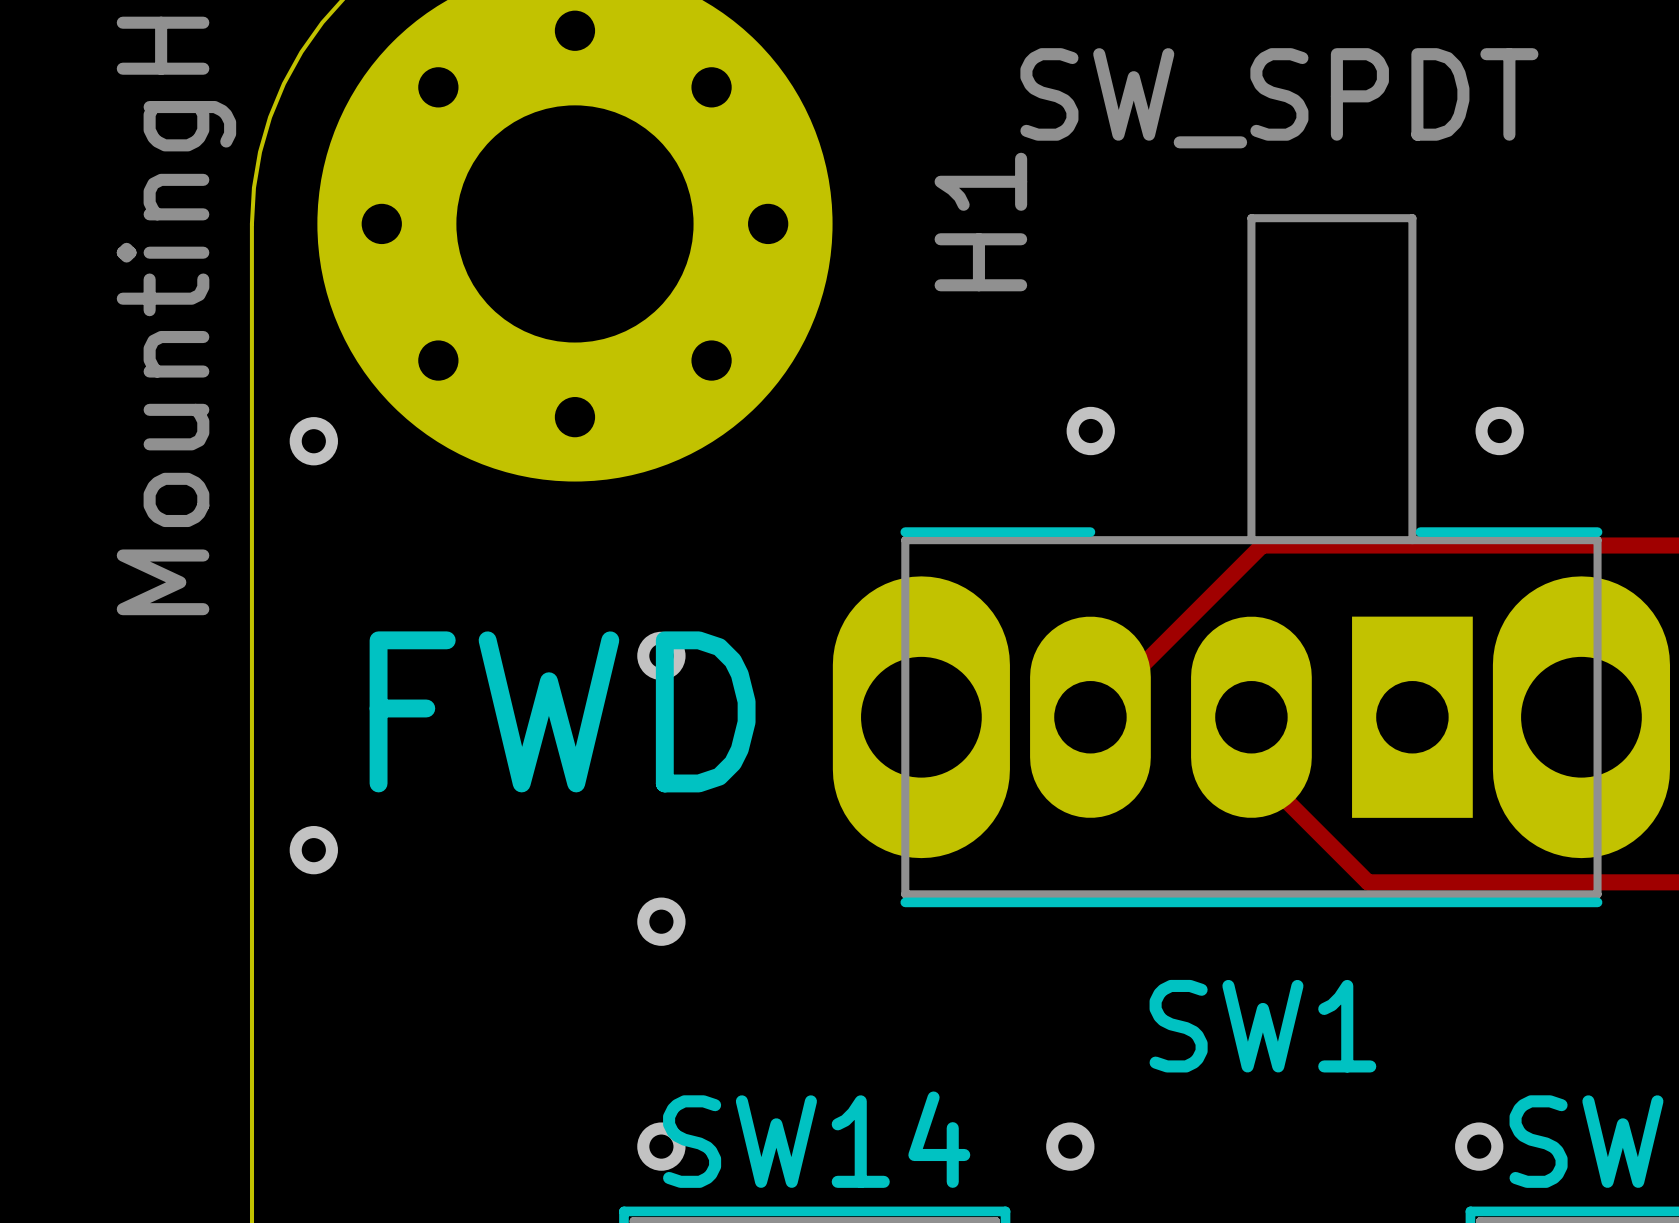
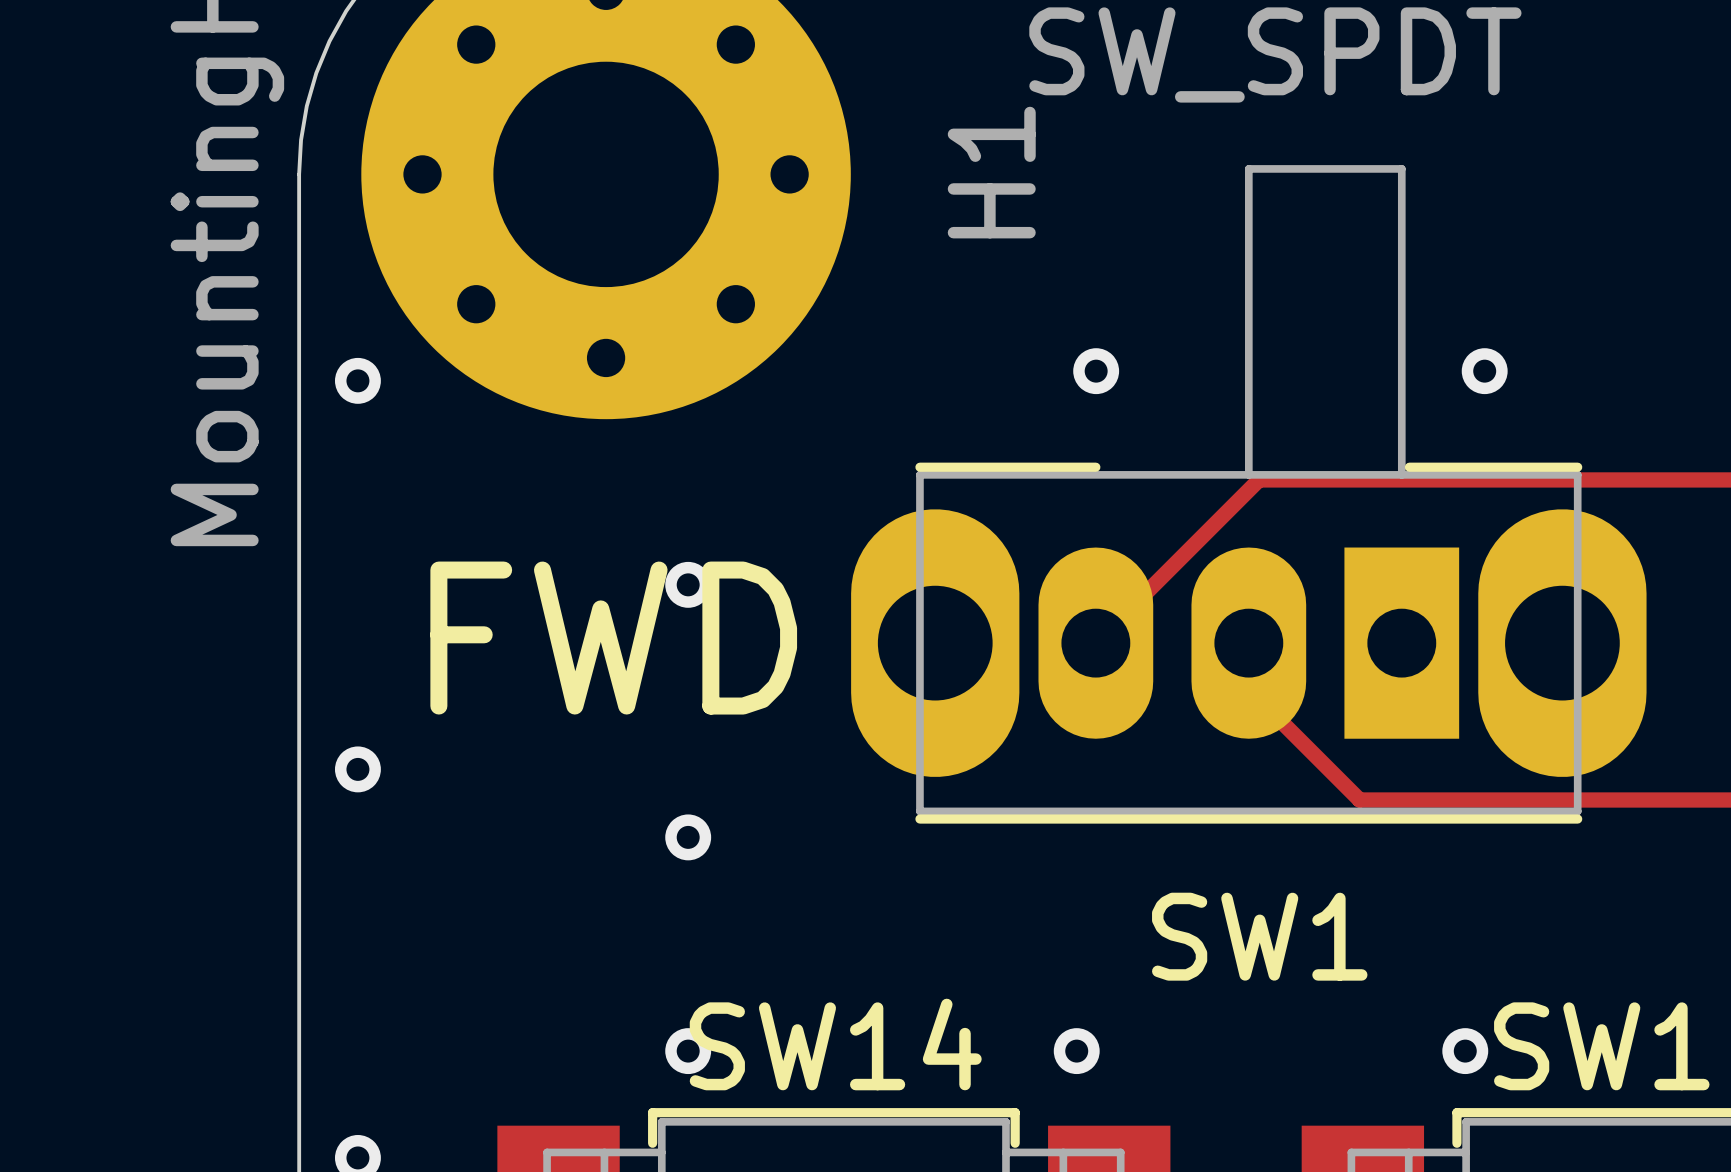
text position: FWD (562, 711) -> FWD (613, 638)

